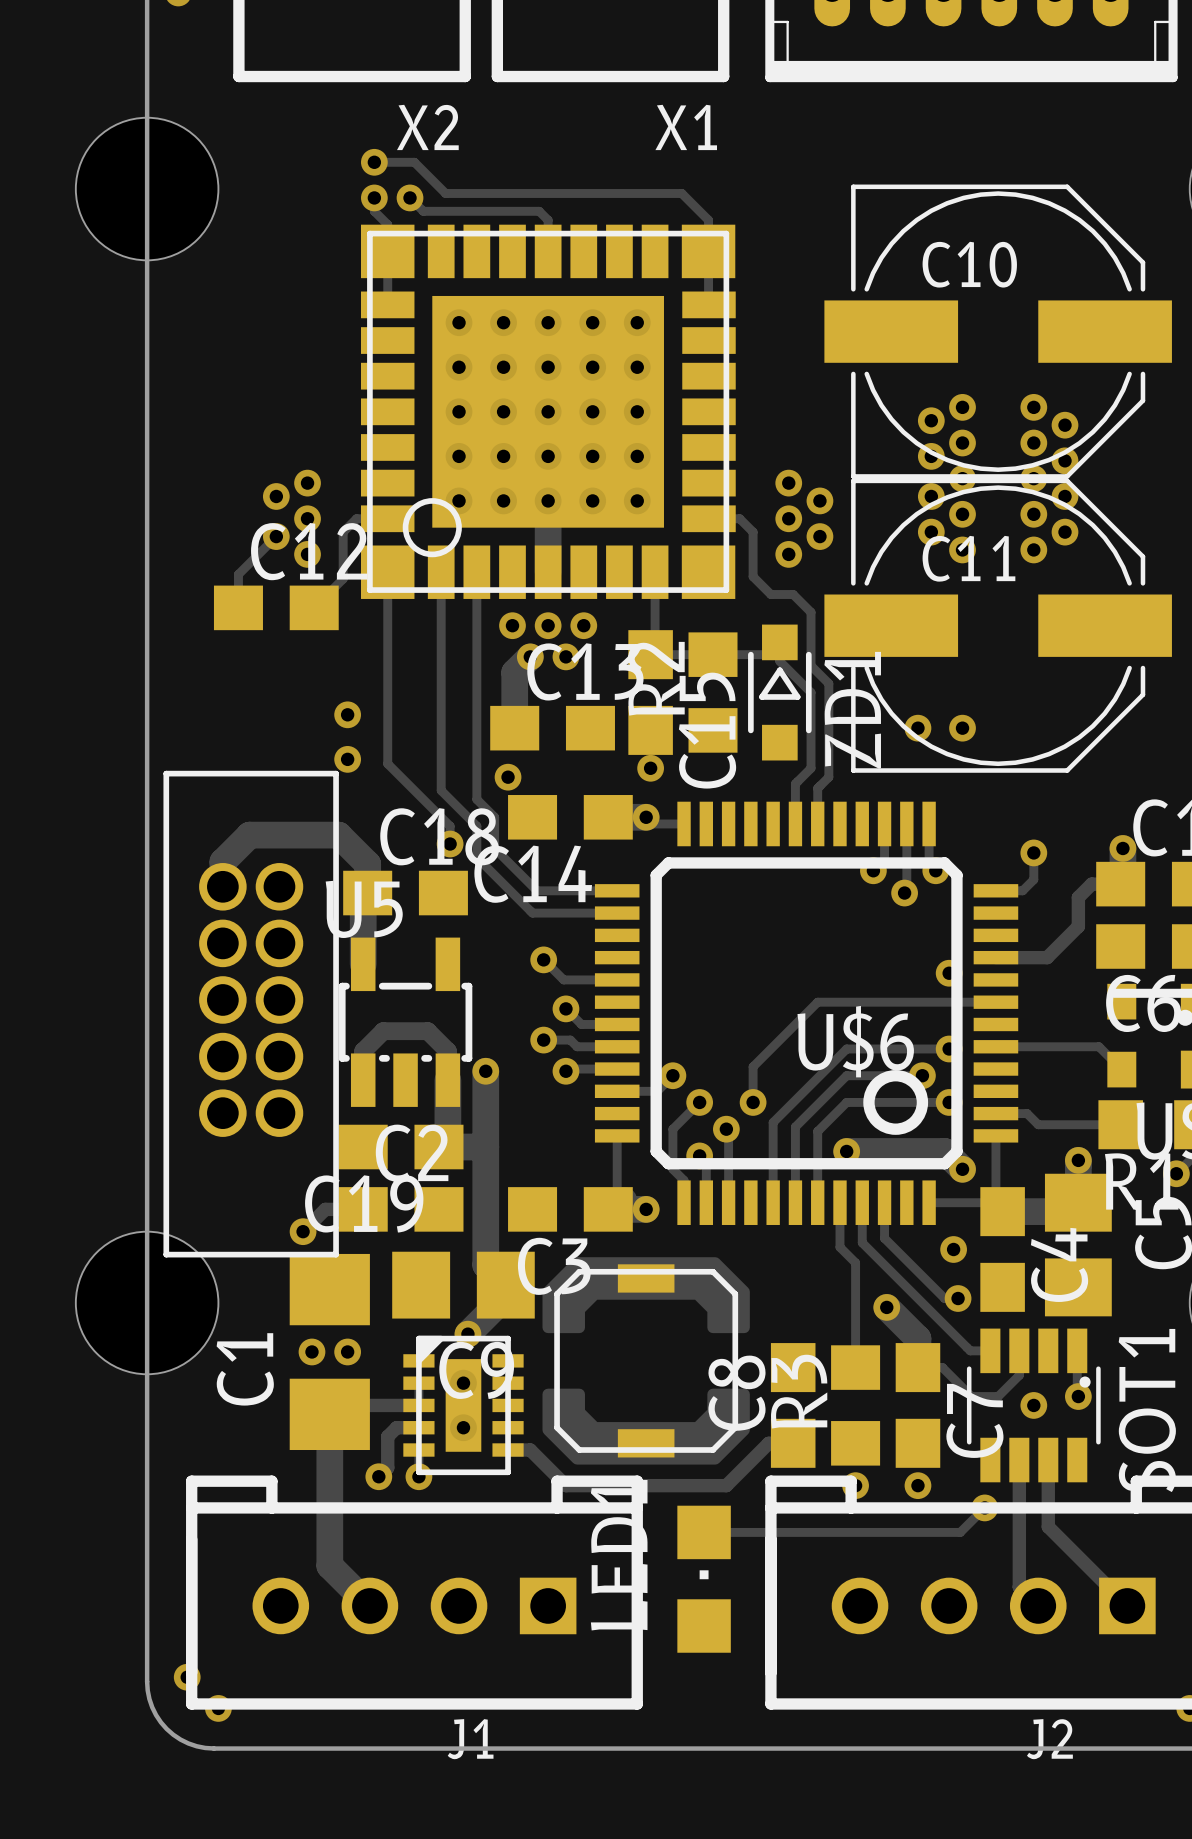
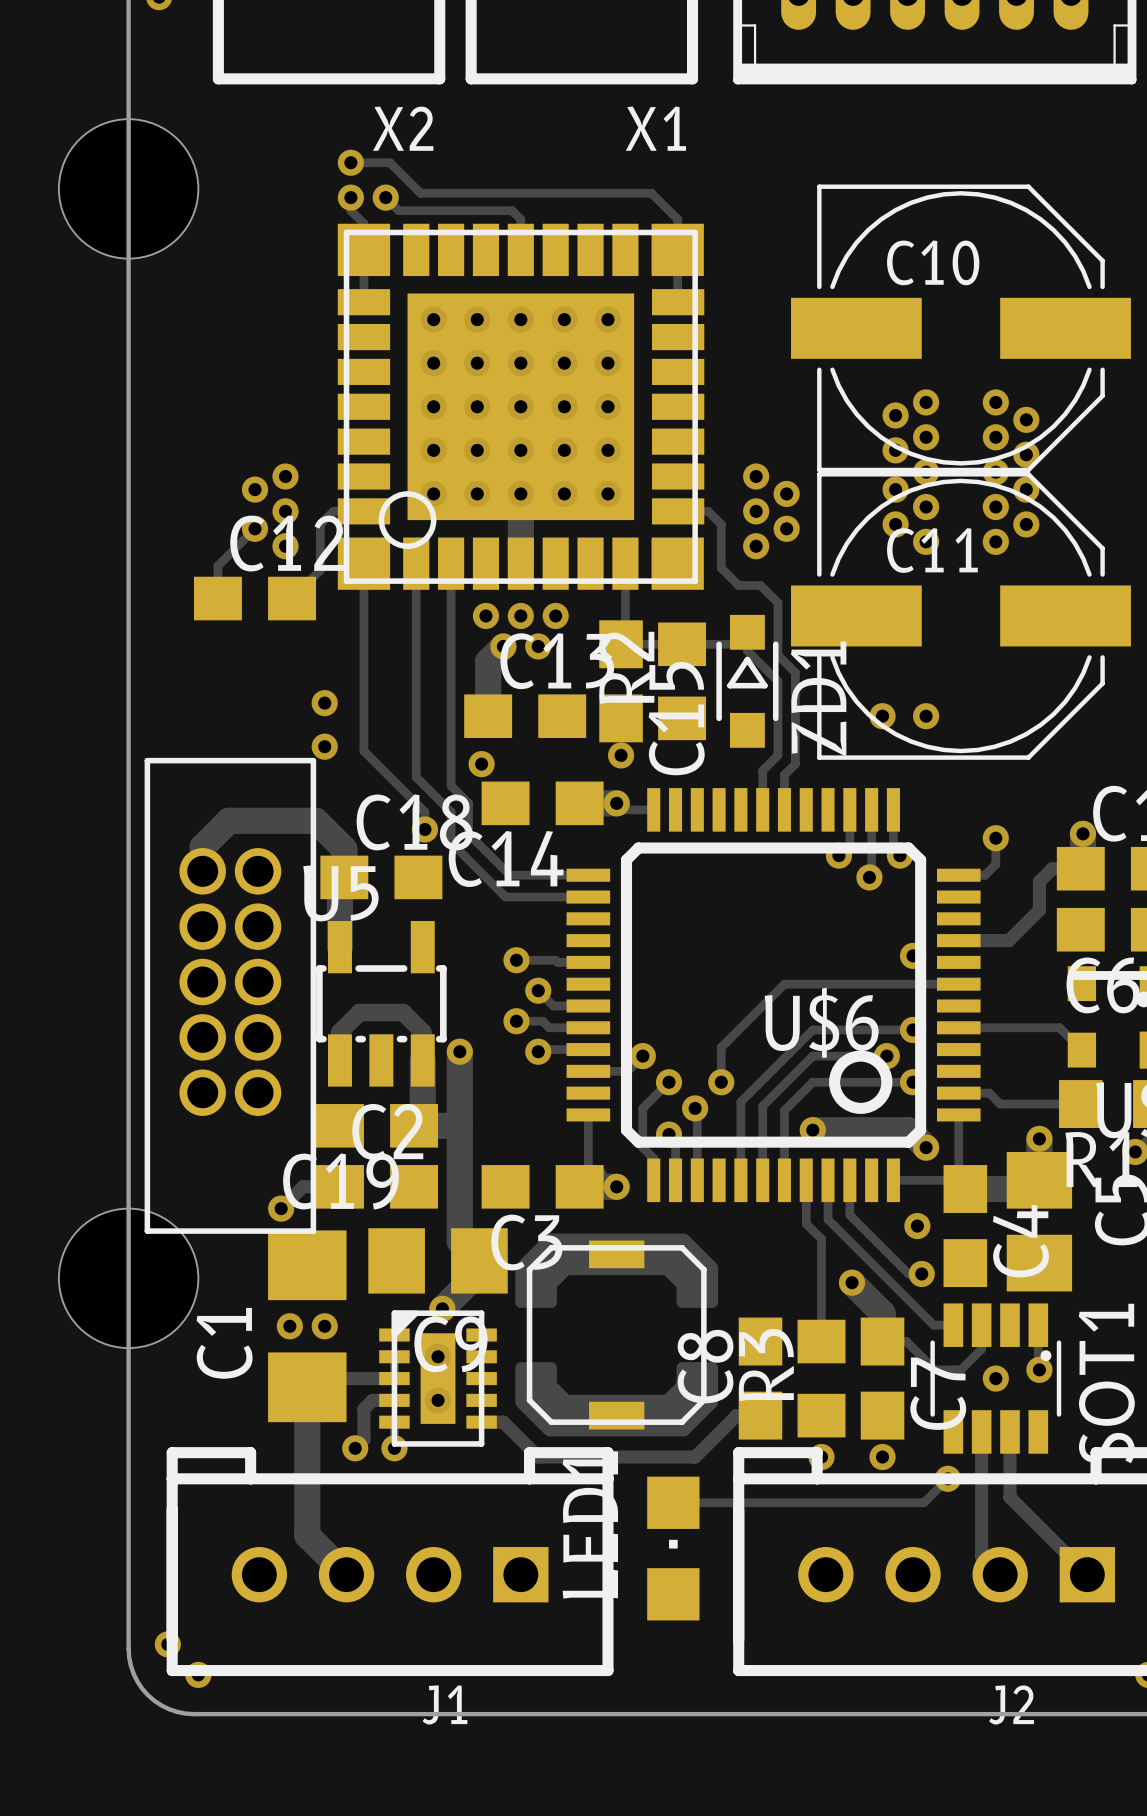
track: (543, 959) (563, 979) (586, 979) -> (516, 960) (555, 960) (557, 962)
via position: (543, 959) -> (516, 960)

